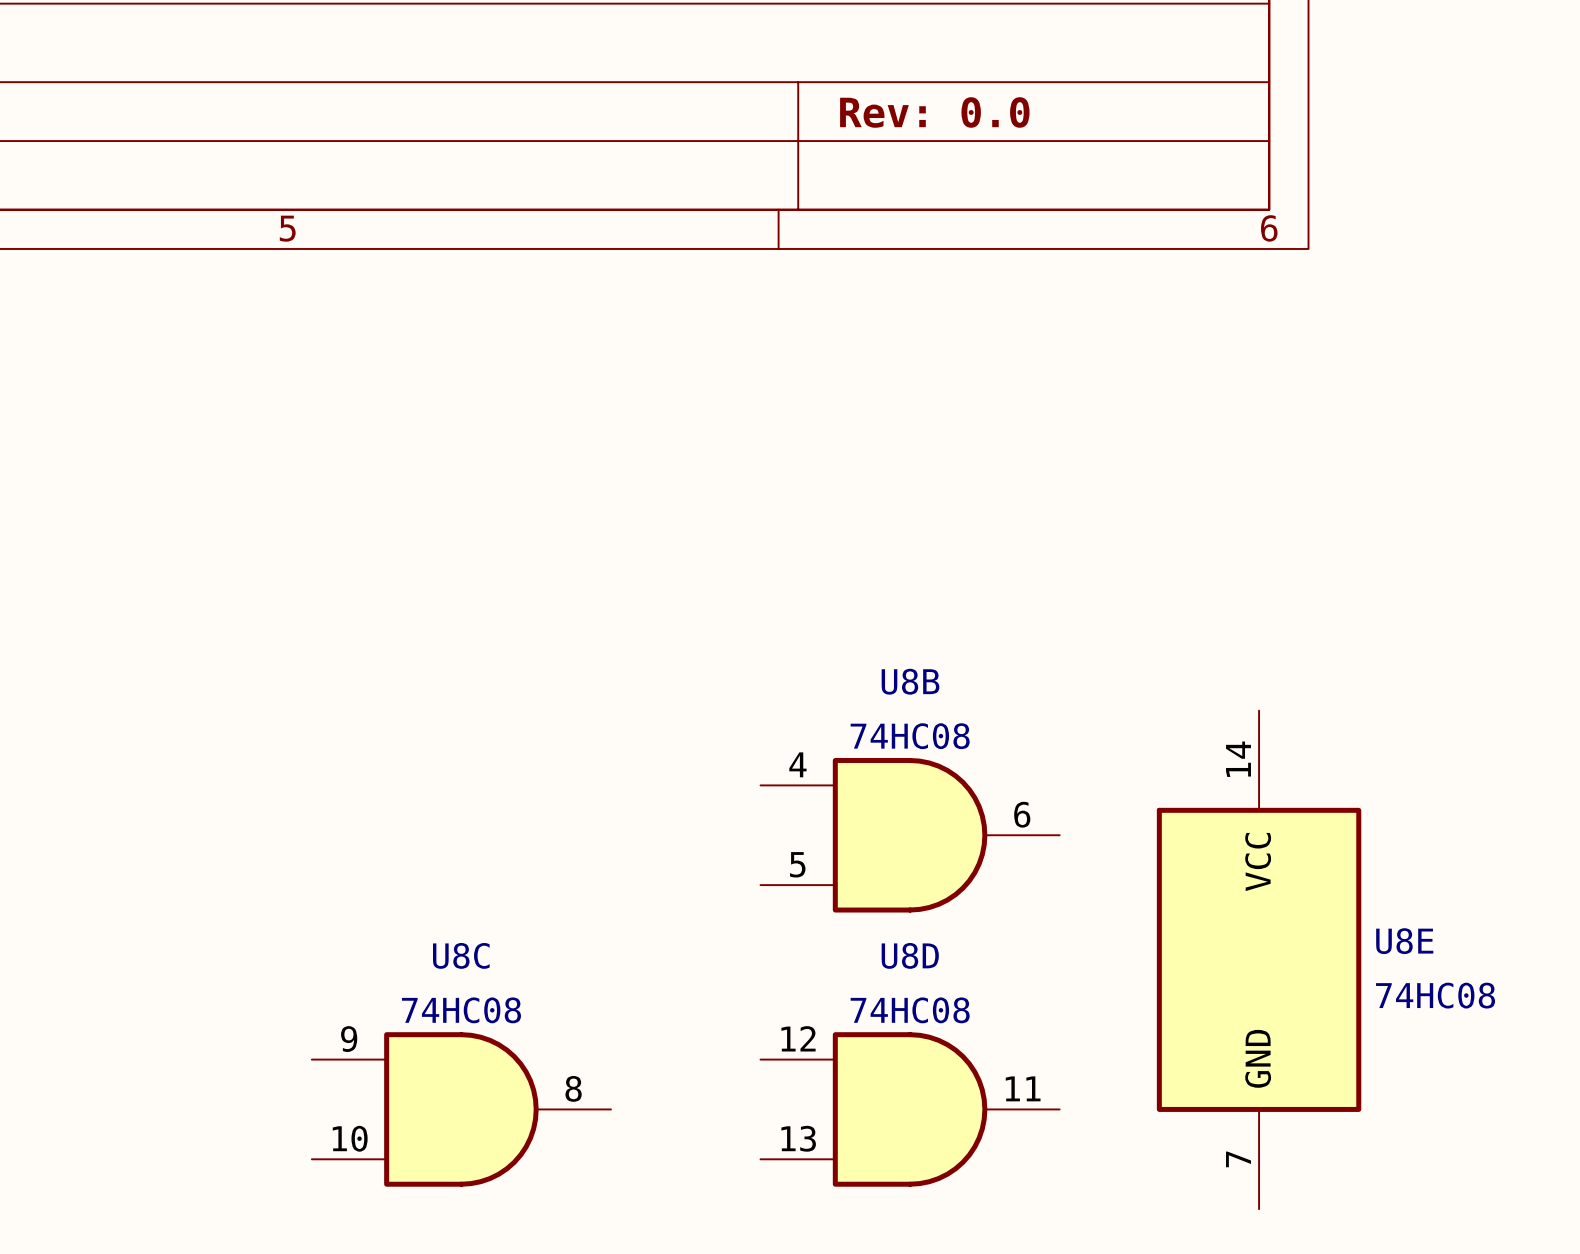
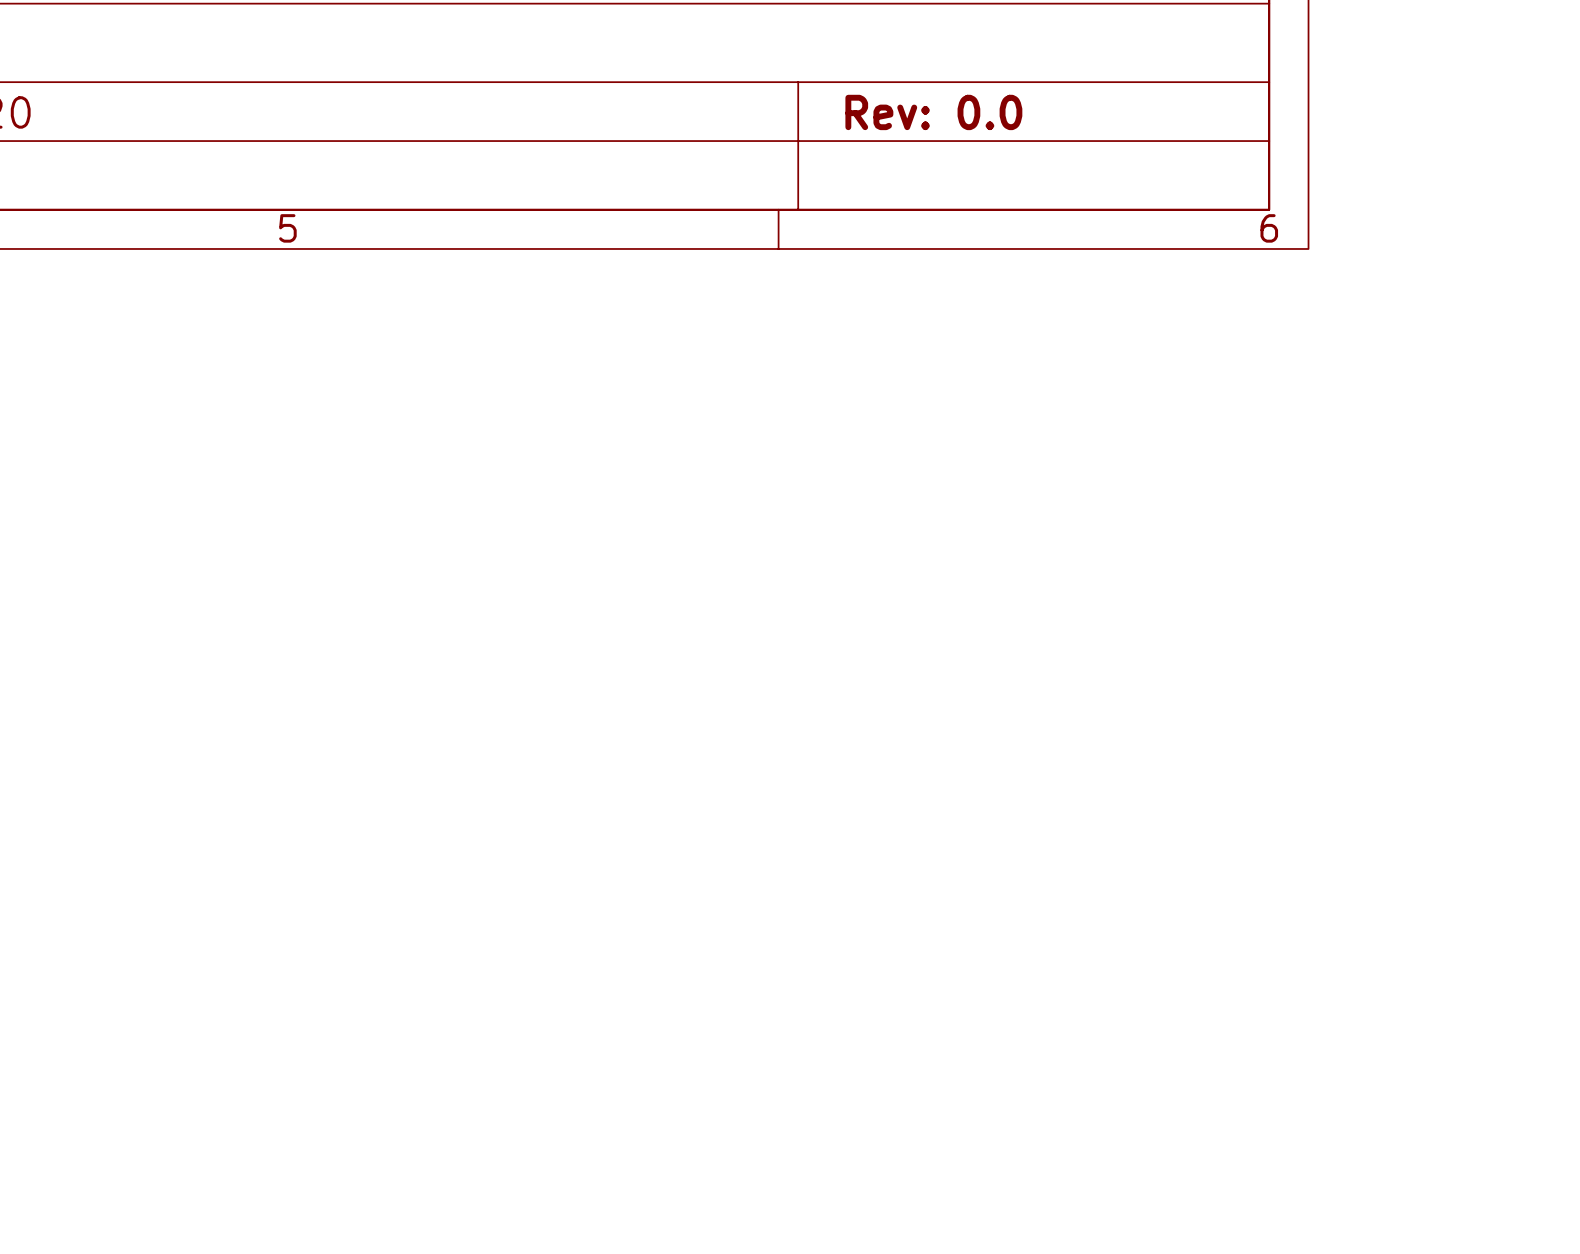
U8B: 74HC08 (910, 835) -> none
U8E: 74HC08 (1259, 959) -> none
U8C: 74HC08 (461, 1109) -> none
U8D: 74HC08 (910, 1109) -> none

